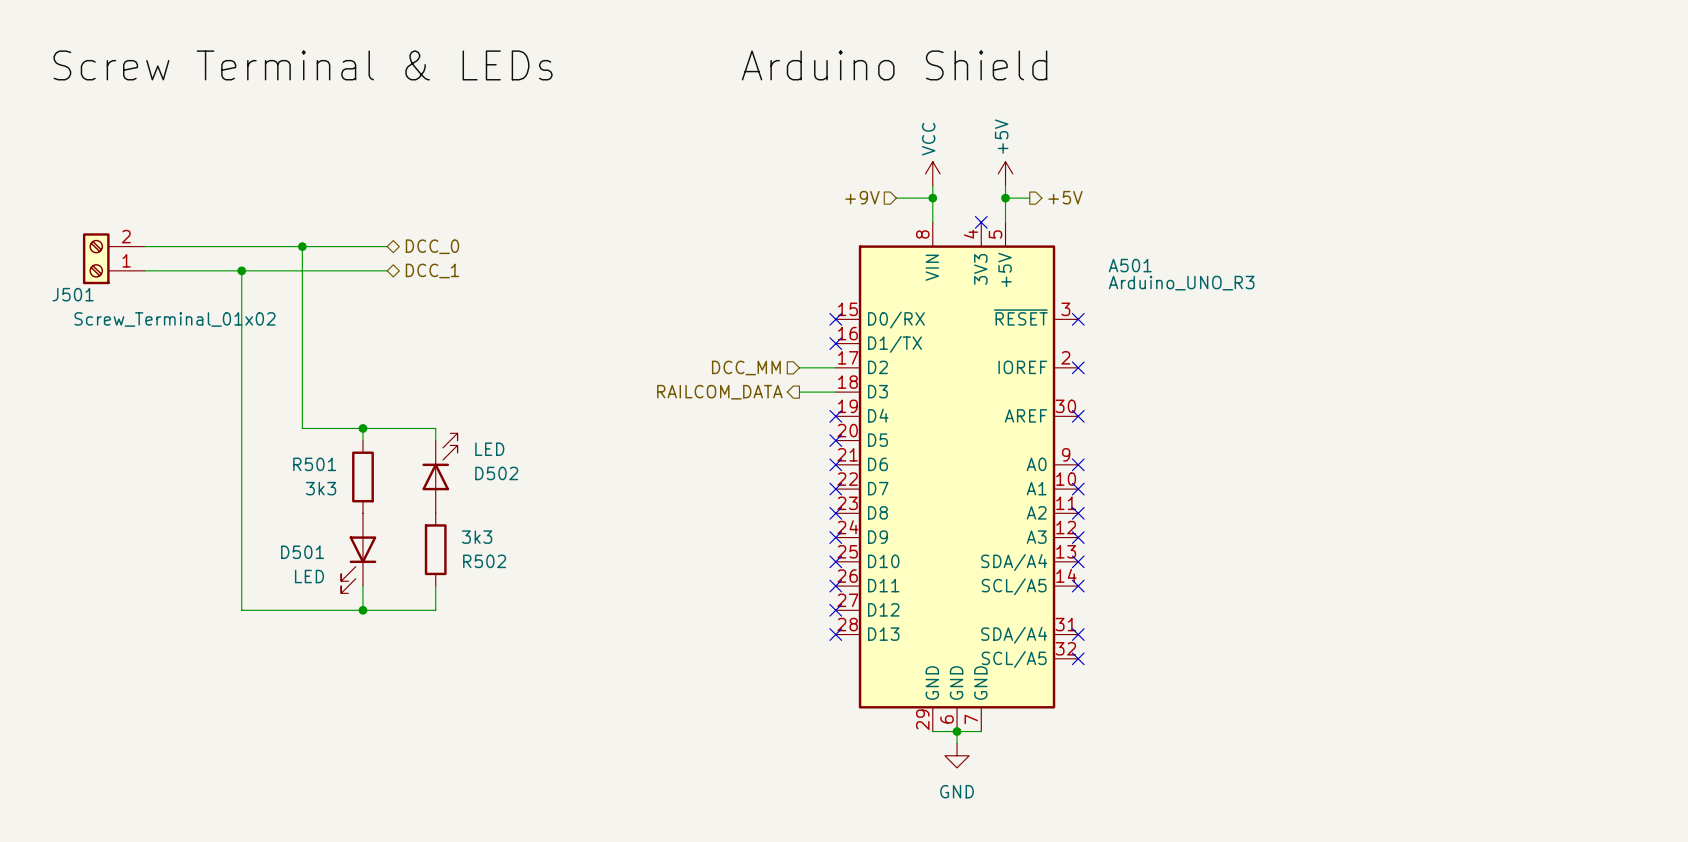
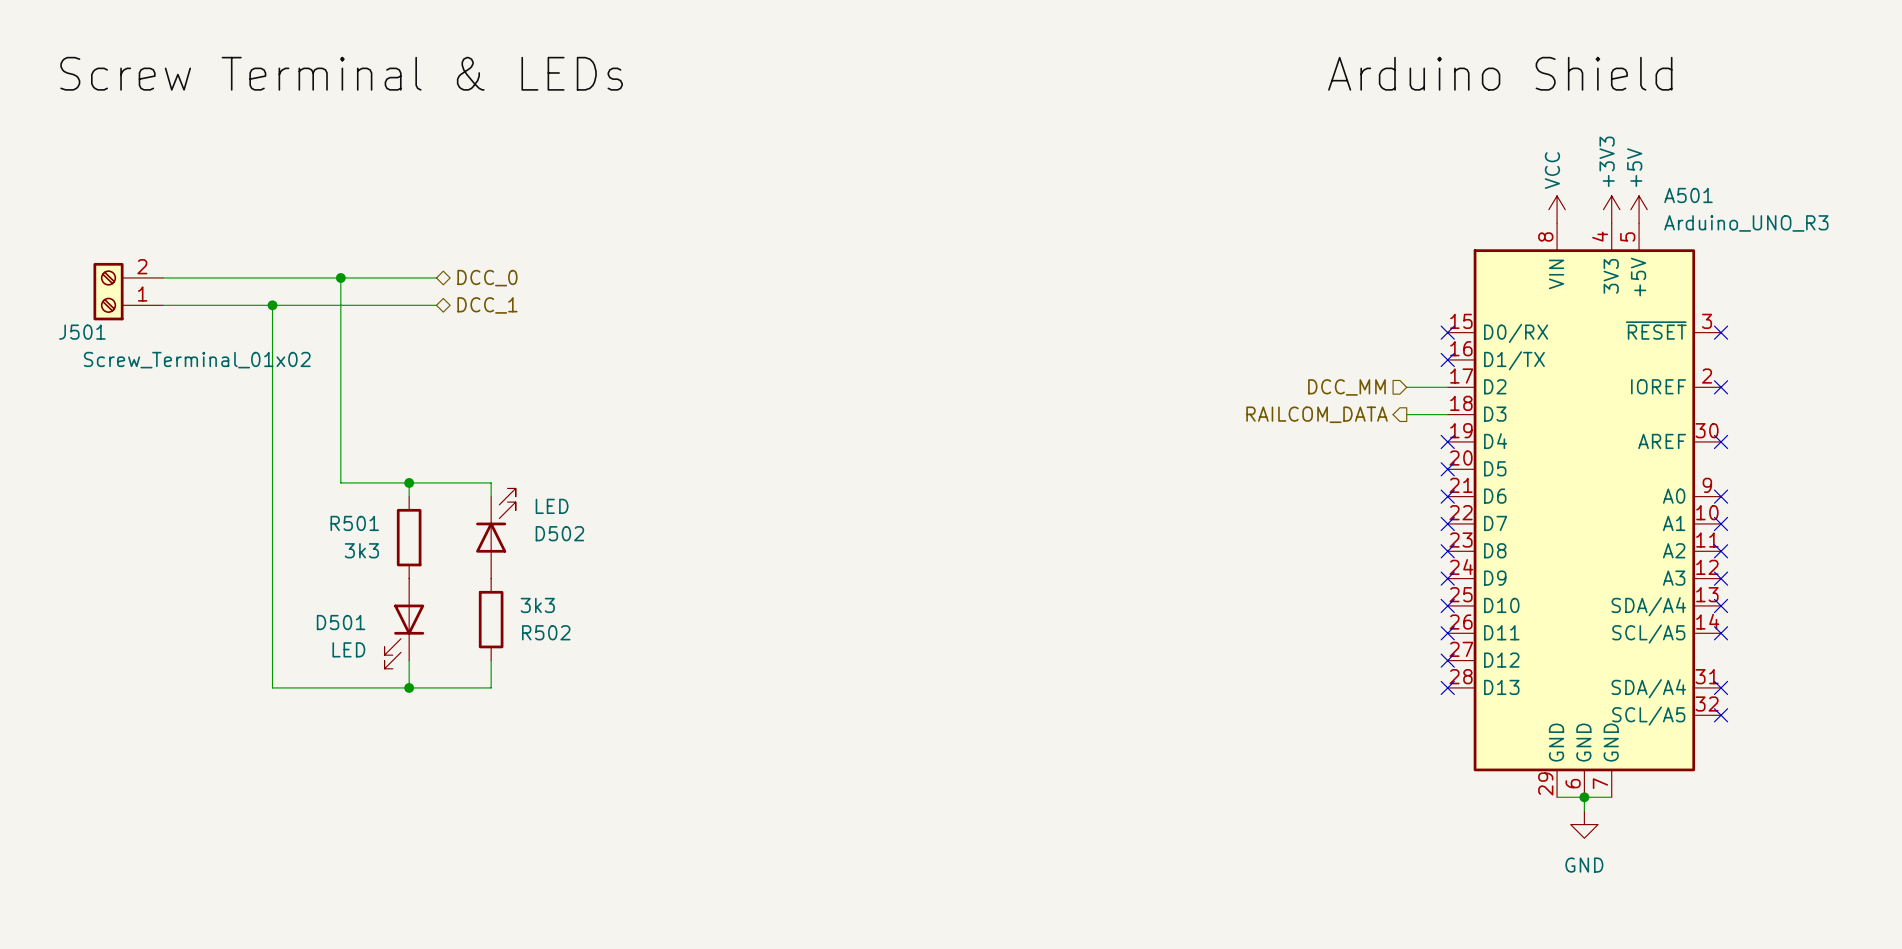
label: Arduino Shield (894, 65) -> none
label: none -> Arduino Shield (1500, 73)
power symbol: VCC (932, 173) -> none
power symbol: +5V (1005, 173) -> none
wire: (932, 185) (932, 222) -> none
wire: (1005, 185) (1005, 222) -> none
power symbol: none -> VCC (1557, 209)
power symbol: none -> +3V3 (1611, 209)
power symbol: none -> +5V (1639, 209)
hierarchical label: +9V (862, 197) -> none
hierarchical label: +5V (1065, 197) -> none
wire: (896, 198) (932, 198) -> none
junction: (932, 198) -> none
wire: (1005, 198) (1029, 198) -> none
junction: (1005, 198) -> none
no-connect mark: (981, 222) -> none
A501 name position: A501 (1130, 265) -> A501 (1688, 195)
A501 value position: Arduino_UNO_R3 (1181, 283) -> Arduino_UNO_R3 (1746, 223)
no-connect mark: none -> (1447, 332)
no-connect mark: none -> (1721, 332)
no-connect mark: (835, 319) -> none
no-connect mark: (1078, 319) -> none
no-connect mark: none -> (1447, 359)
no-connect mark: (835, 343) -> none
hierarchical label: none -> DCC_MM (1346, 387)
wire: none -> (1406, 387) (1447, 387)
no-connect mark: none -> (1721, 387)
hierarchical label: DCC_MM (746, 367) -> none
wire: (799, 367) (835, 367) -> none
no-connect mark: (1078, 367) -> none
hierarchical label: none -> RAILCOM_DATA (1317, 414)
wire: none -> (1406, 414) (1447, 414)
hierarchical label: RAILCOM_DATA (719, 392) -> none
wire: (799, 392) (835, 392) -> none
no-connect mark: none -> (1447, 441)
no-connect mark: none -> (1721, 441)
no-connect mark: (835, 416) -> none
no-connect mark: (1078, 416) -> none
no-connect mark: none -> (1447, 469)
no-connect mark: (835, 440) -> none
no-connect mark: none -> (1447, 496)
no-connect mark: none -> (1721, 496)
no-connect mark: (835, 464) -> none
no-connect mark: (1078, 464) -> none
no-connect mark: none -> (1447, 523)
no-connect mark: none -> (1721, 523)
A501 position: (957, 476) -> (1584, 510)
no-connect mark: (835, 489) -> none
no-connect mark: (1078, 489) -> none
no-connect mark: none -> (1447, 551)
no-connect mark: none -> (1721, 551)
no-connect mark: (835, 513) -> none
no-connect mark: (1078, 513) -> none
no-connect mark: none -> (1447, 578)
no-connect mark: none -> (1721, 578)
no-connect mark: (835, 537) -> none
no-connect mark: (1078, 537) -> none
no-connect mark: none -> (1447, 605)
no-connect mark: none -> (1721, 605)
no-connect mark: (835, 561) -> none
no-connect mark: (1078, 561) -> none
no-connect mark: none -> (1447, 633)
no-connect mark: none -> (1721, 633)
no-connect mark: (835, 586) -> none
no-connect mark: (1078, 586) -> none
no-connect mark: none -> (1447, 660)
no-connect mark: (835, 610) -> none
no-connect mark: none -> (1447, 687)
no-connect mark: none -> (1721, 687)
no-connect mark: (835, 634) -> none
no-connect mark: (1078, 634) -> none
no-connect mark: none -> (1721, 715)
no-connect mark: (1078, 658) -> none
wire: none -> (1557, 797) (1611, 797)
wire: none -> (1584, 797) (1584, 810)
junction: none -> (1584, 797)
wire: (932, 731) (981, 731) -> none
wire: (957, 731) (957, 743) -> none
junction: (957, 731) -> none
power symbol: none -> GND (1584, 824)
power symbol: GND (957, 755) -> none

